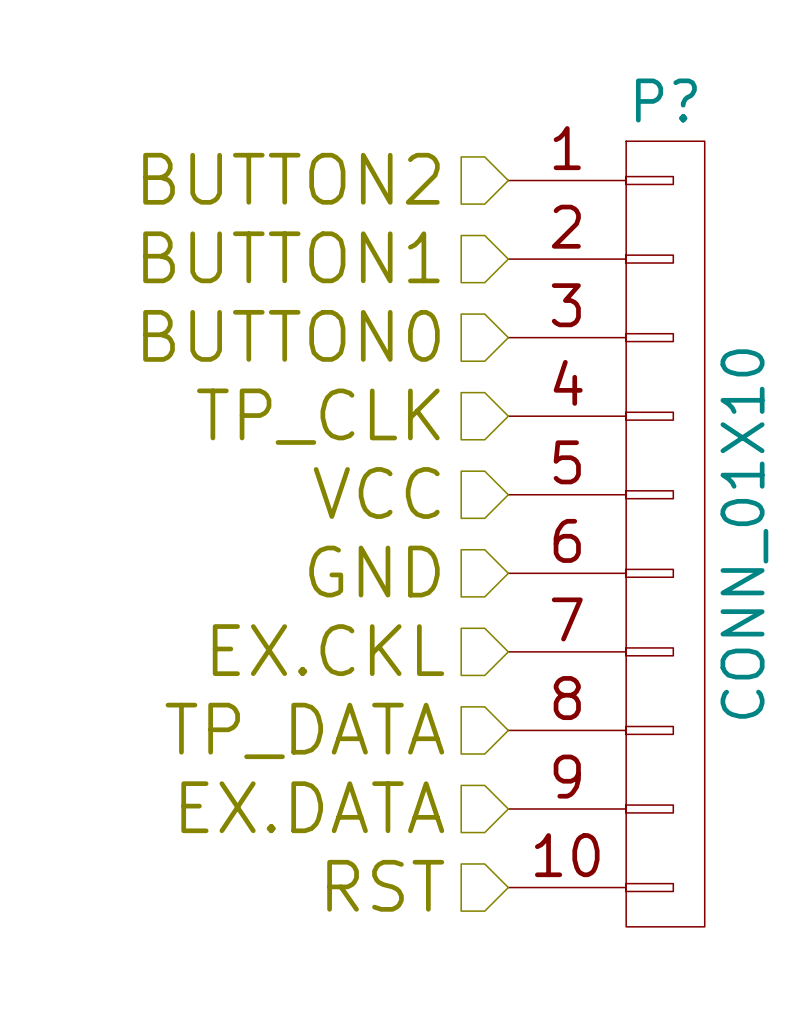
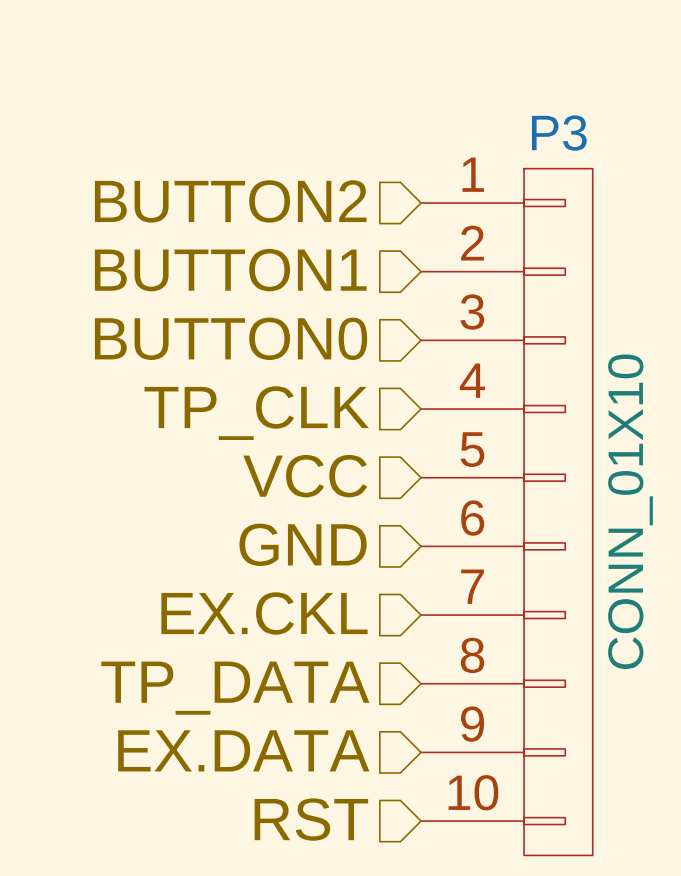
P? name: P? (666, 100) -> P3 (559, 133)

